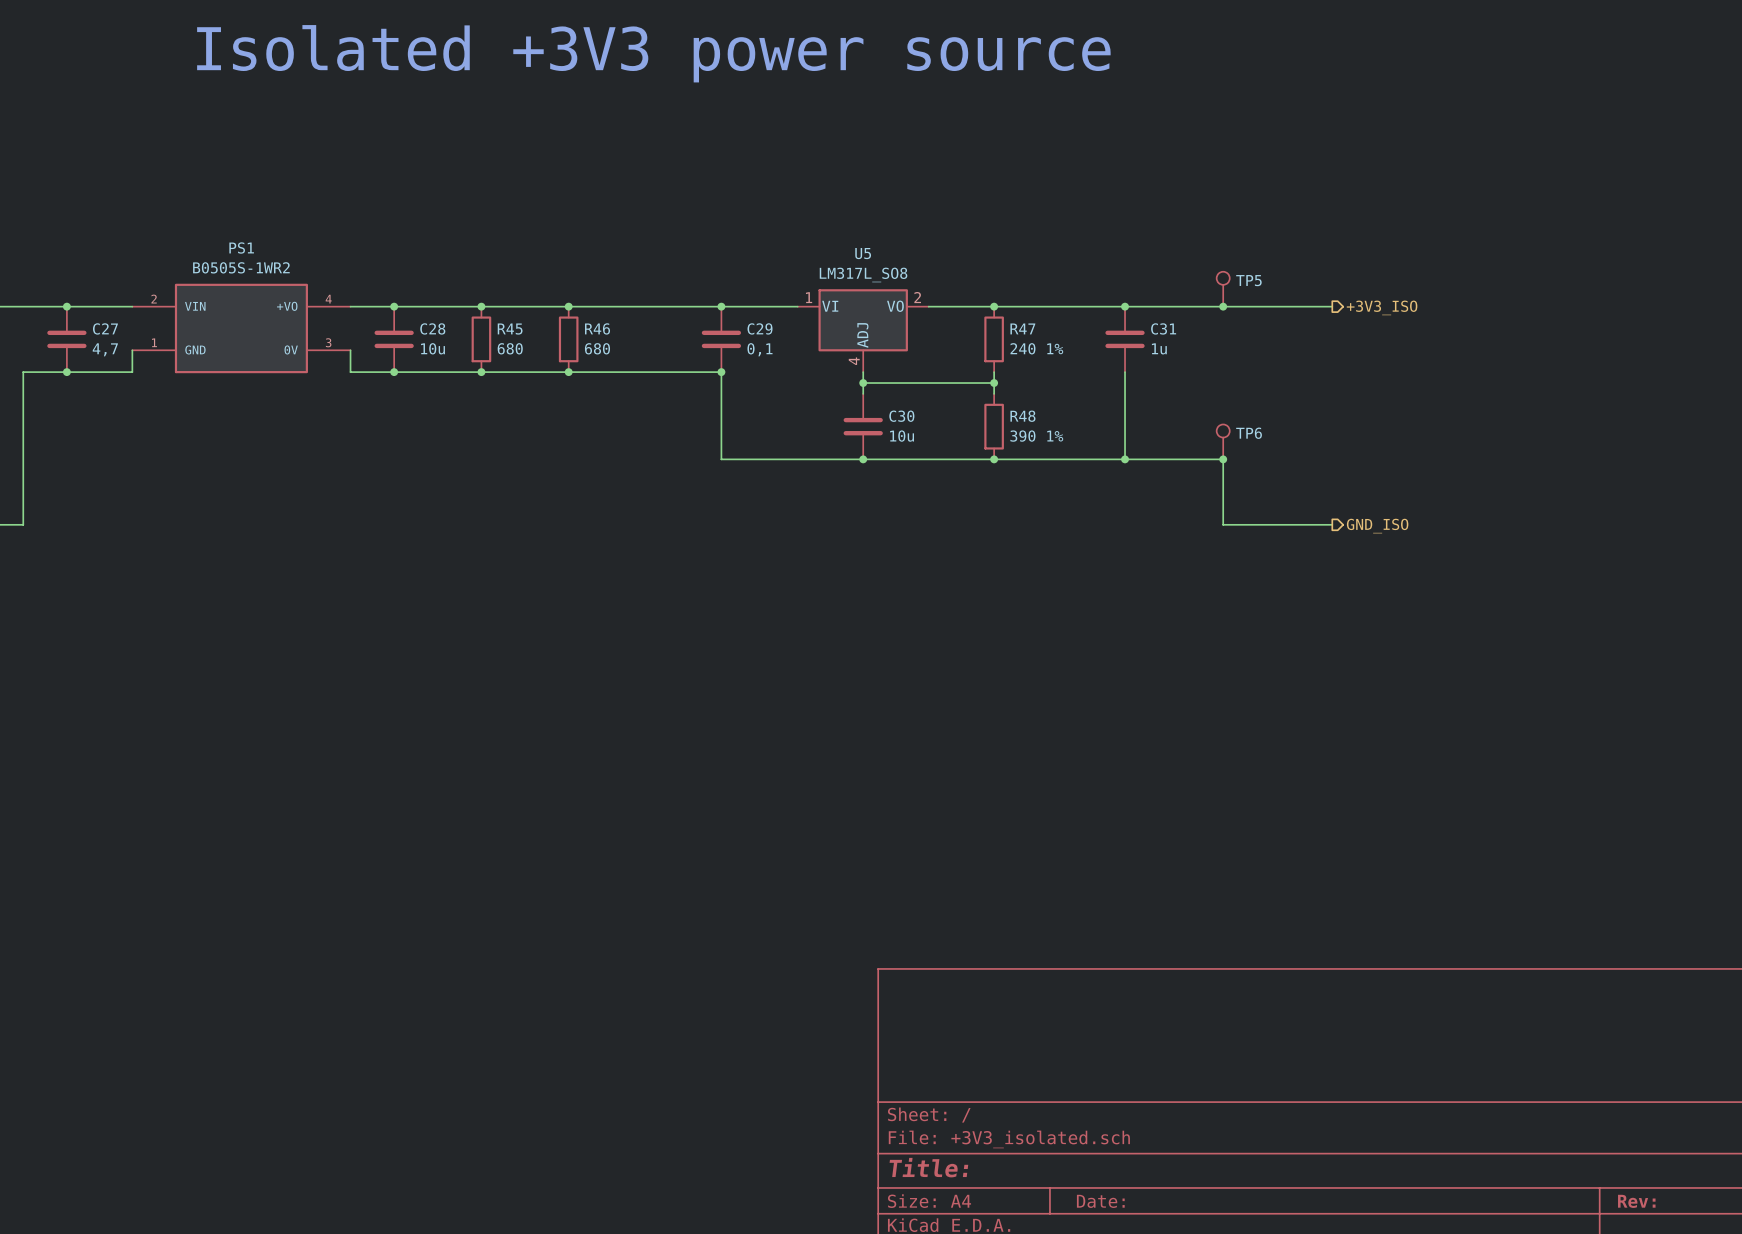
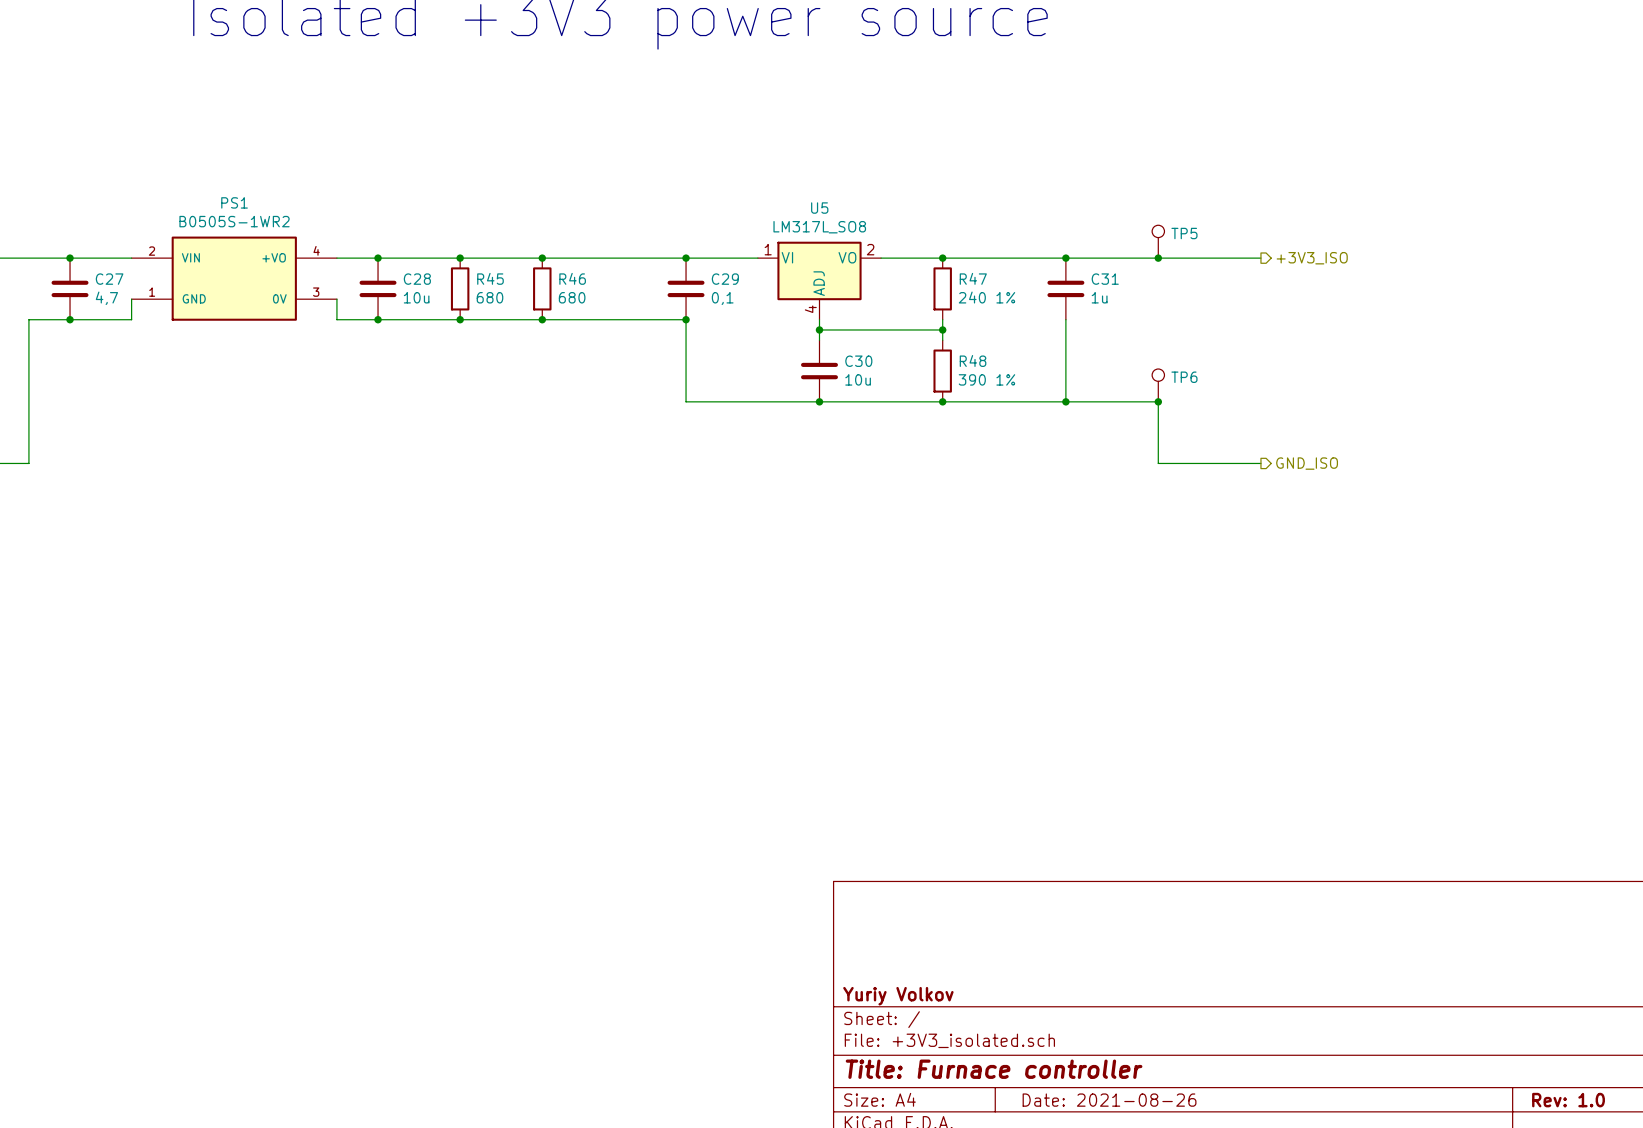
title block: none -> Yuriy Volkov (898, 996)
title block: Title: (928, 1167) -> Title: Furnace controller (994, 1069)
title block: Date: (1100, 1201) -> Date: 2021-08-26 (1109, 1100)
title block: Rev: (1636, 1201) -> Rev: 1.0 (1568, 1100)

